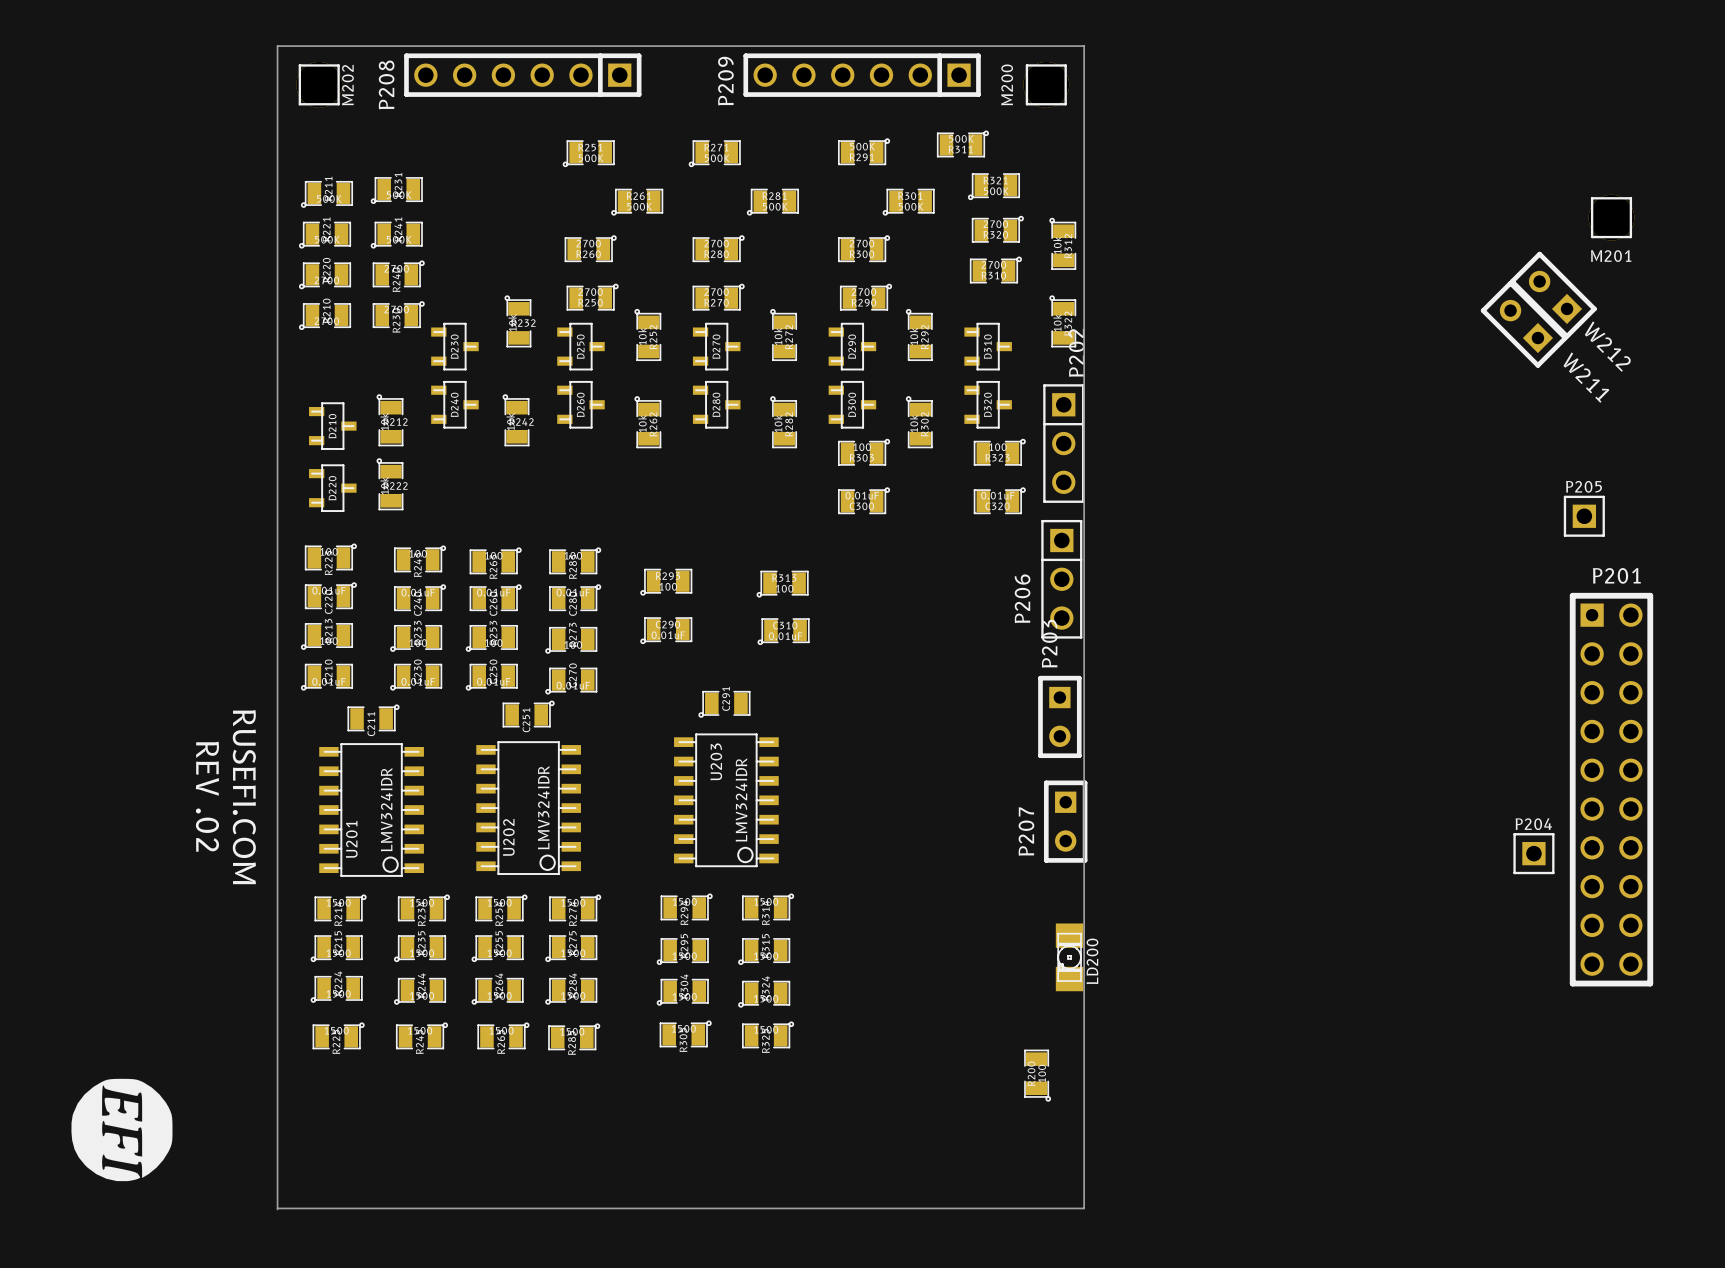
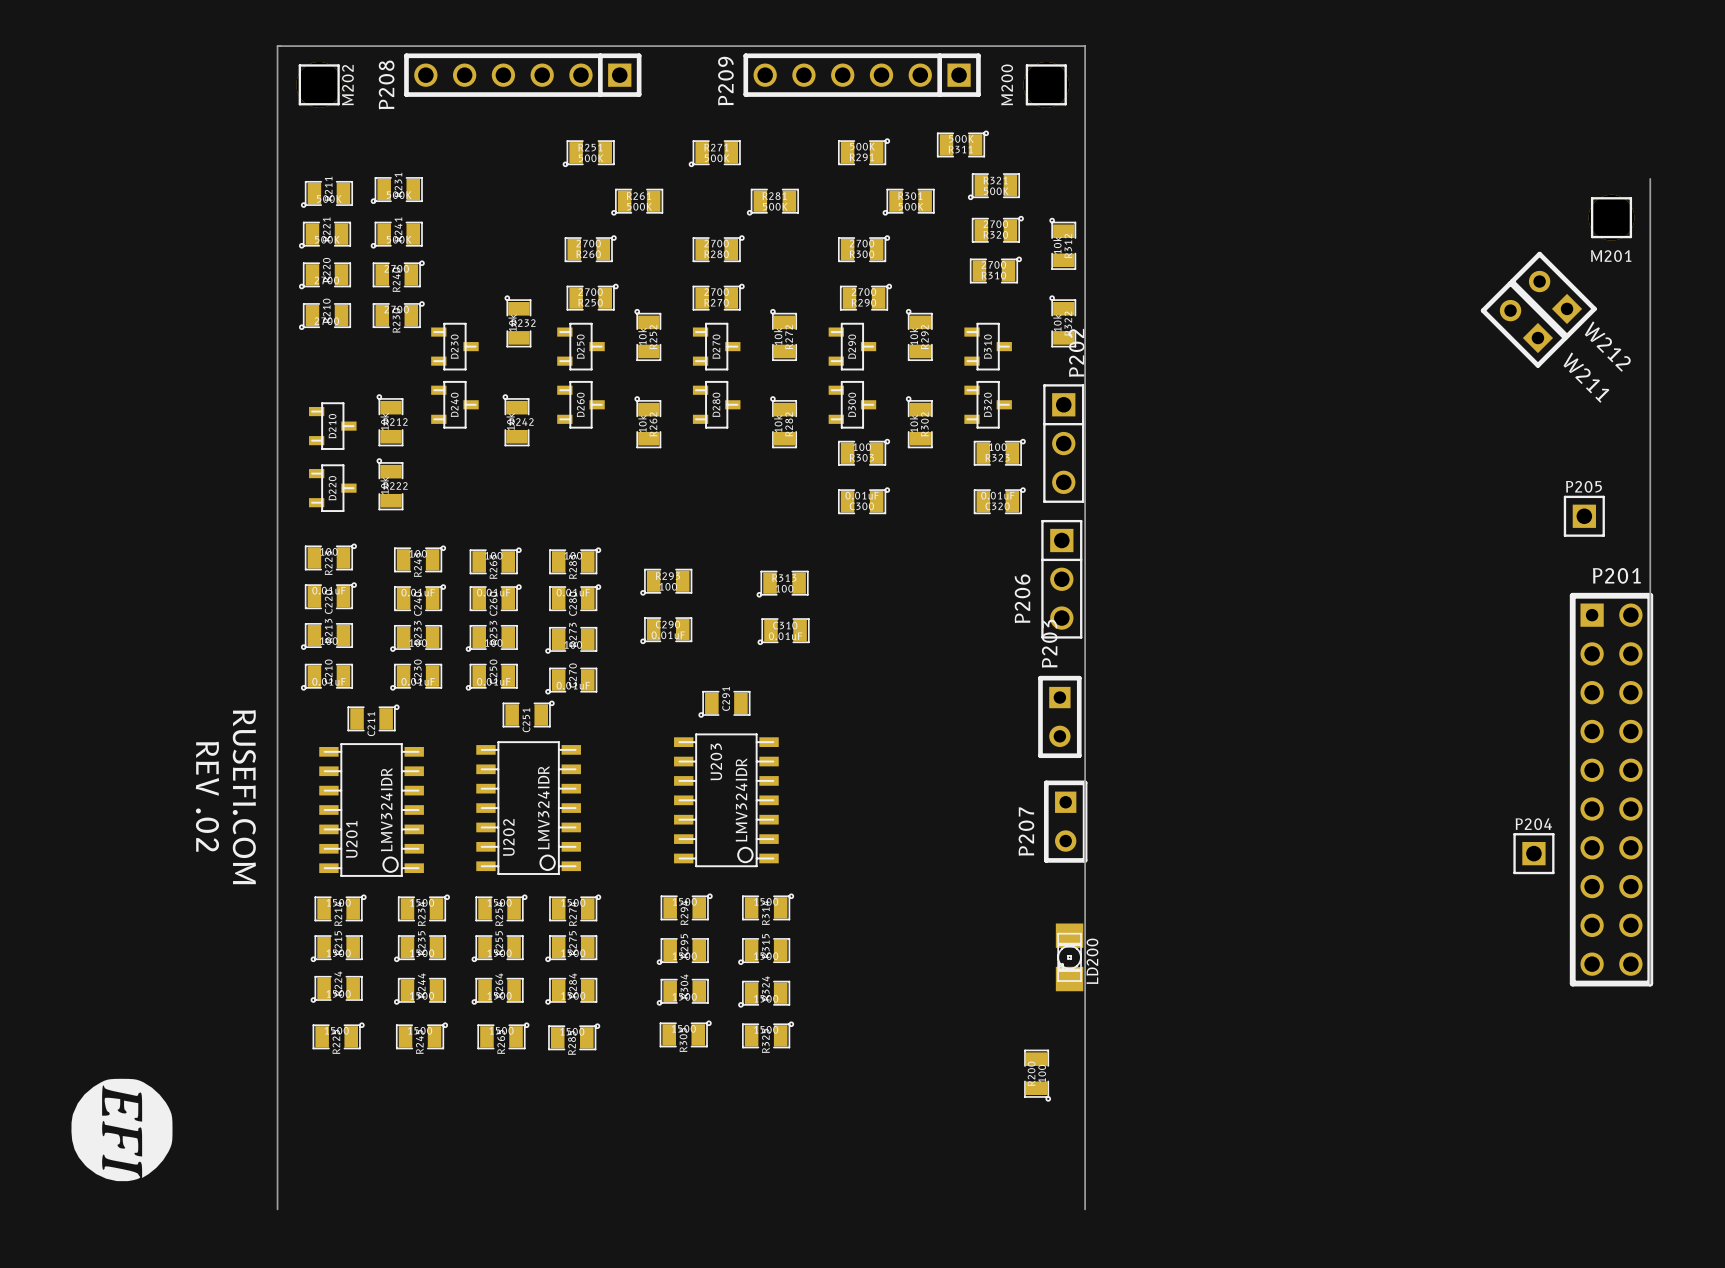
board edge: (1084, 46) (1084, 1208) (277, 1208) -> (1084, 46) (1085, 1209)
board edge: none -> (1650, 178) (1650, 983)

